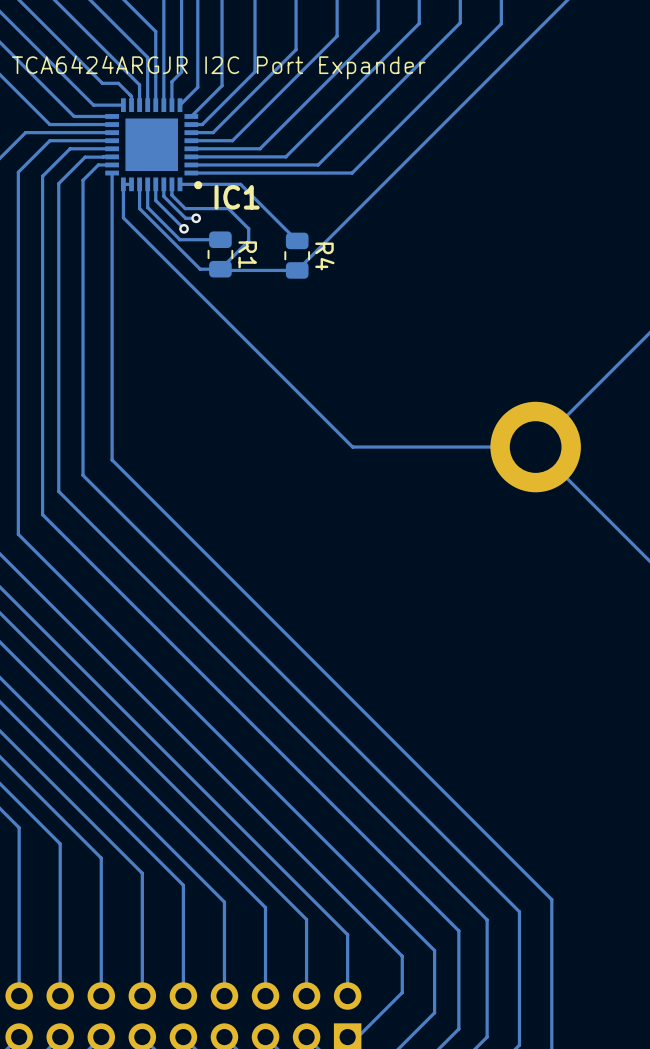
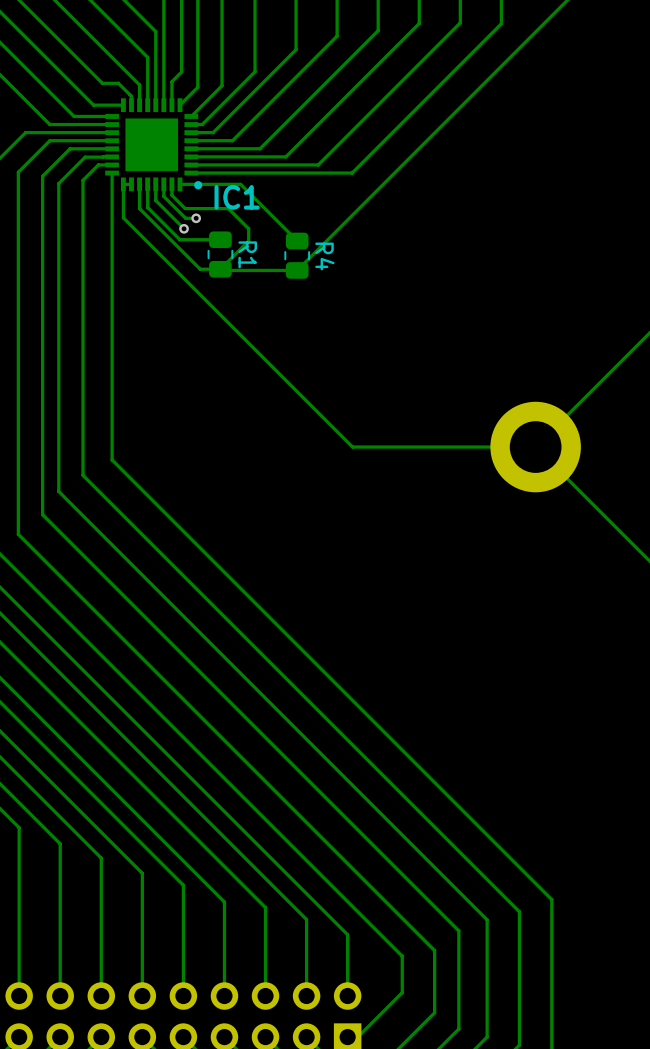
text: TCA6424ARGJR I2C Port Expander (218, 67) -> none

